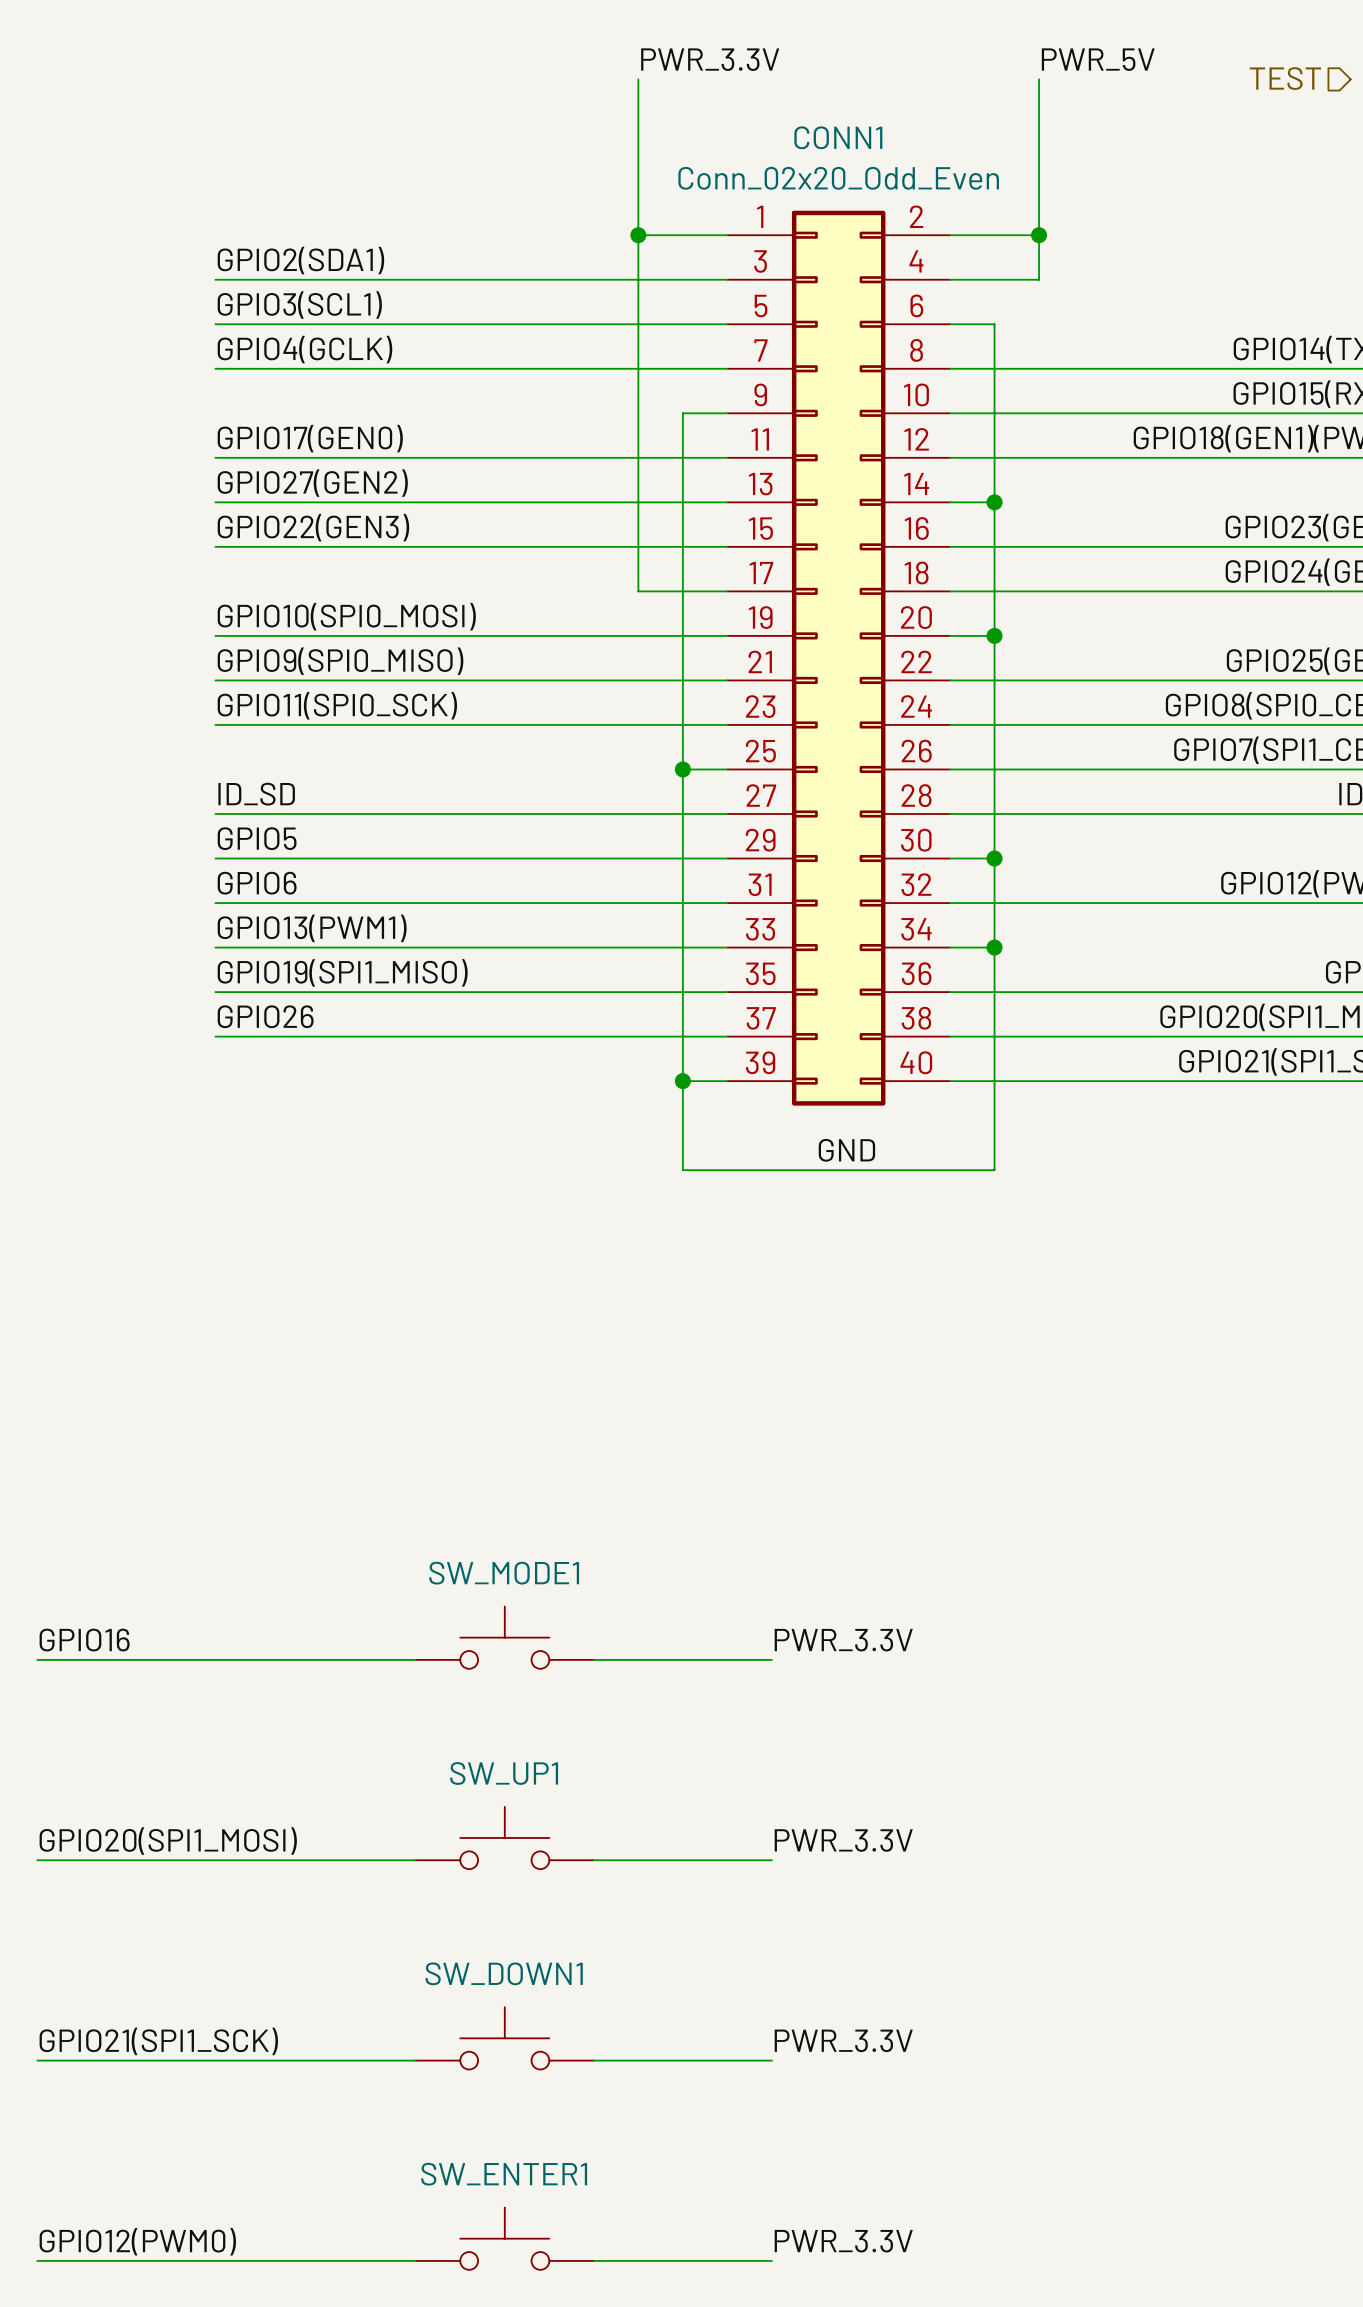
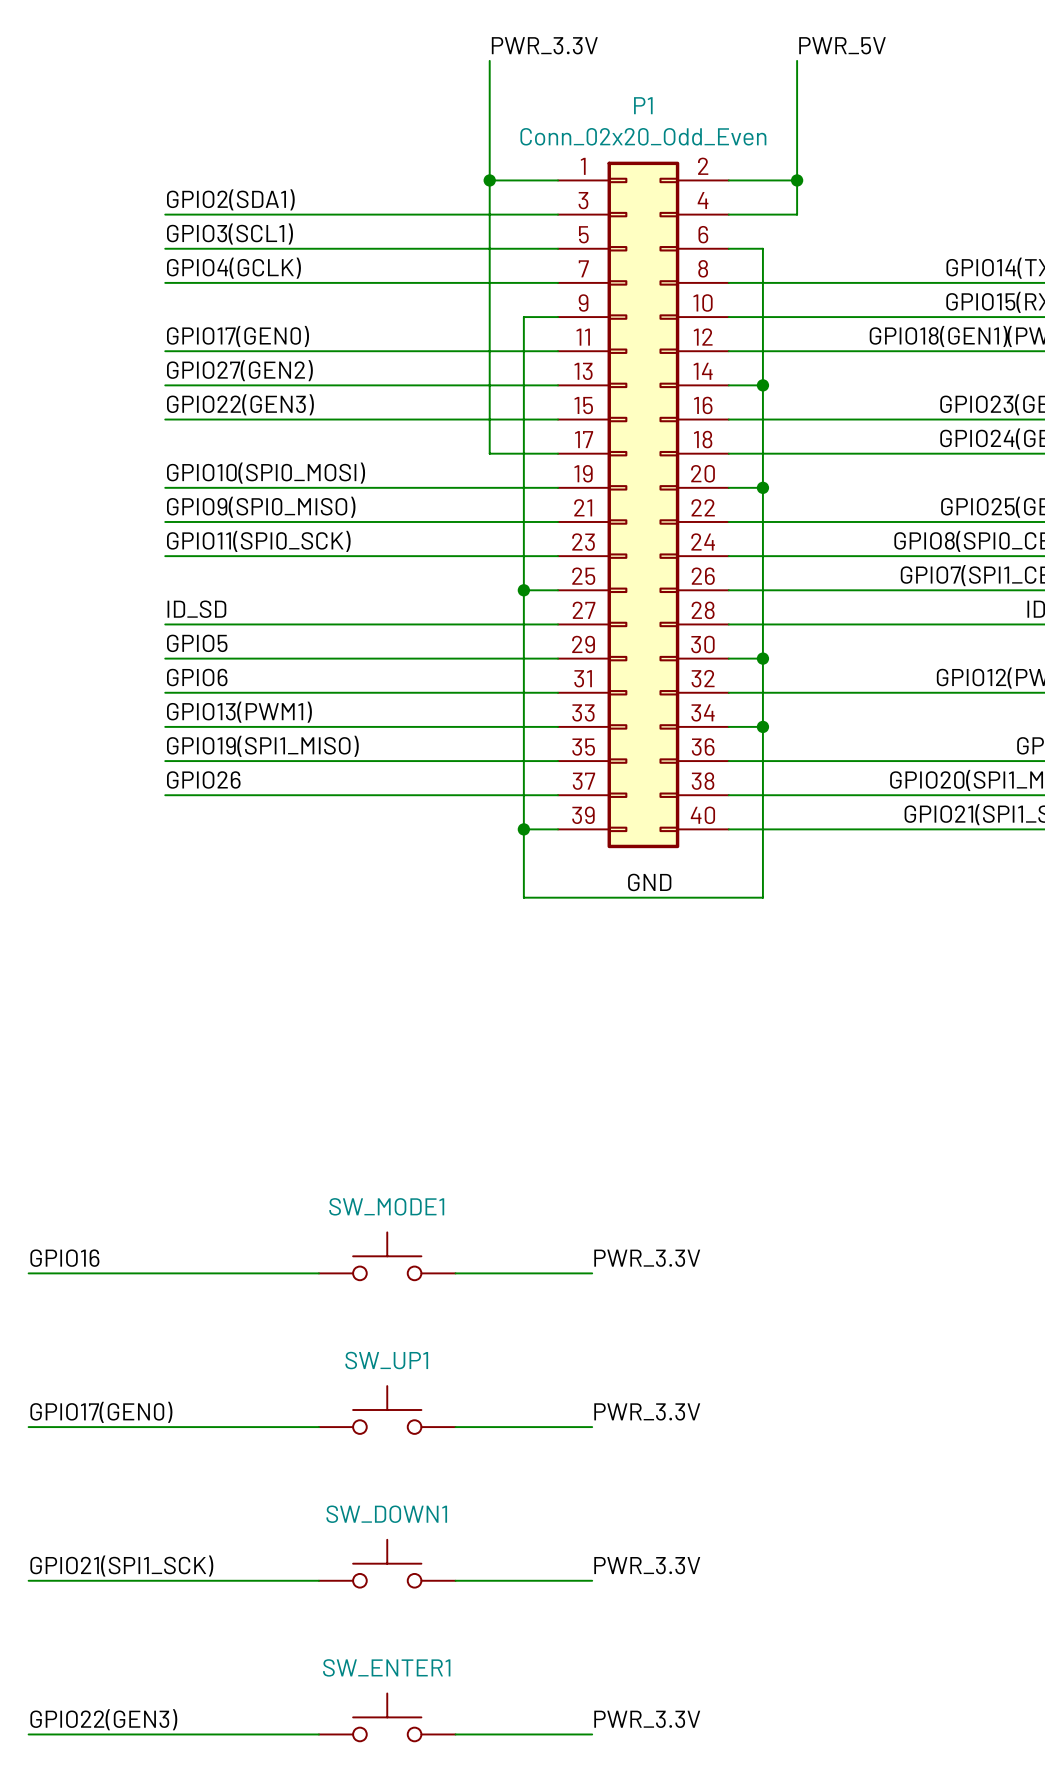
hierarchical label: TEST (1285, 78) -> none
CONN1 name: CONN1 (838, 137) -> P1 (643, 105)
label: GPIO20(SPI1_MOSI) (168, 1841) -> GPIO17(GEN0) (101, 1412)
label: GPIO12(PWM0) (137, 2241) -> GPIO22(GEN3) (103, 1719)

